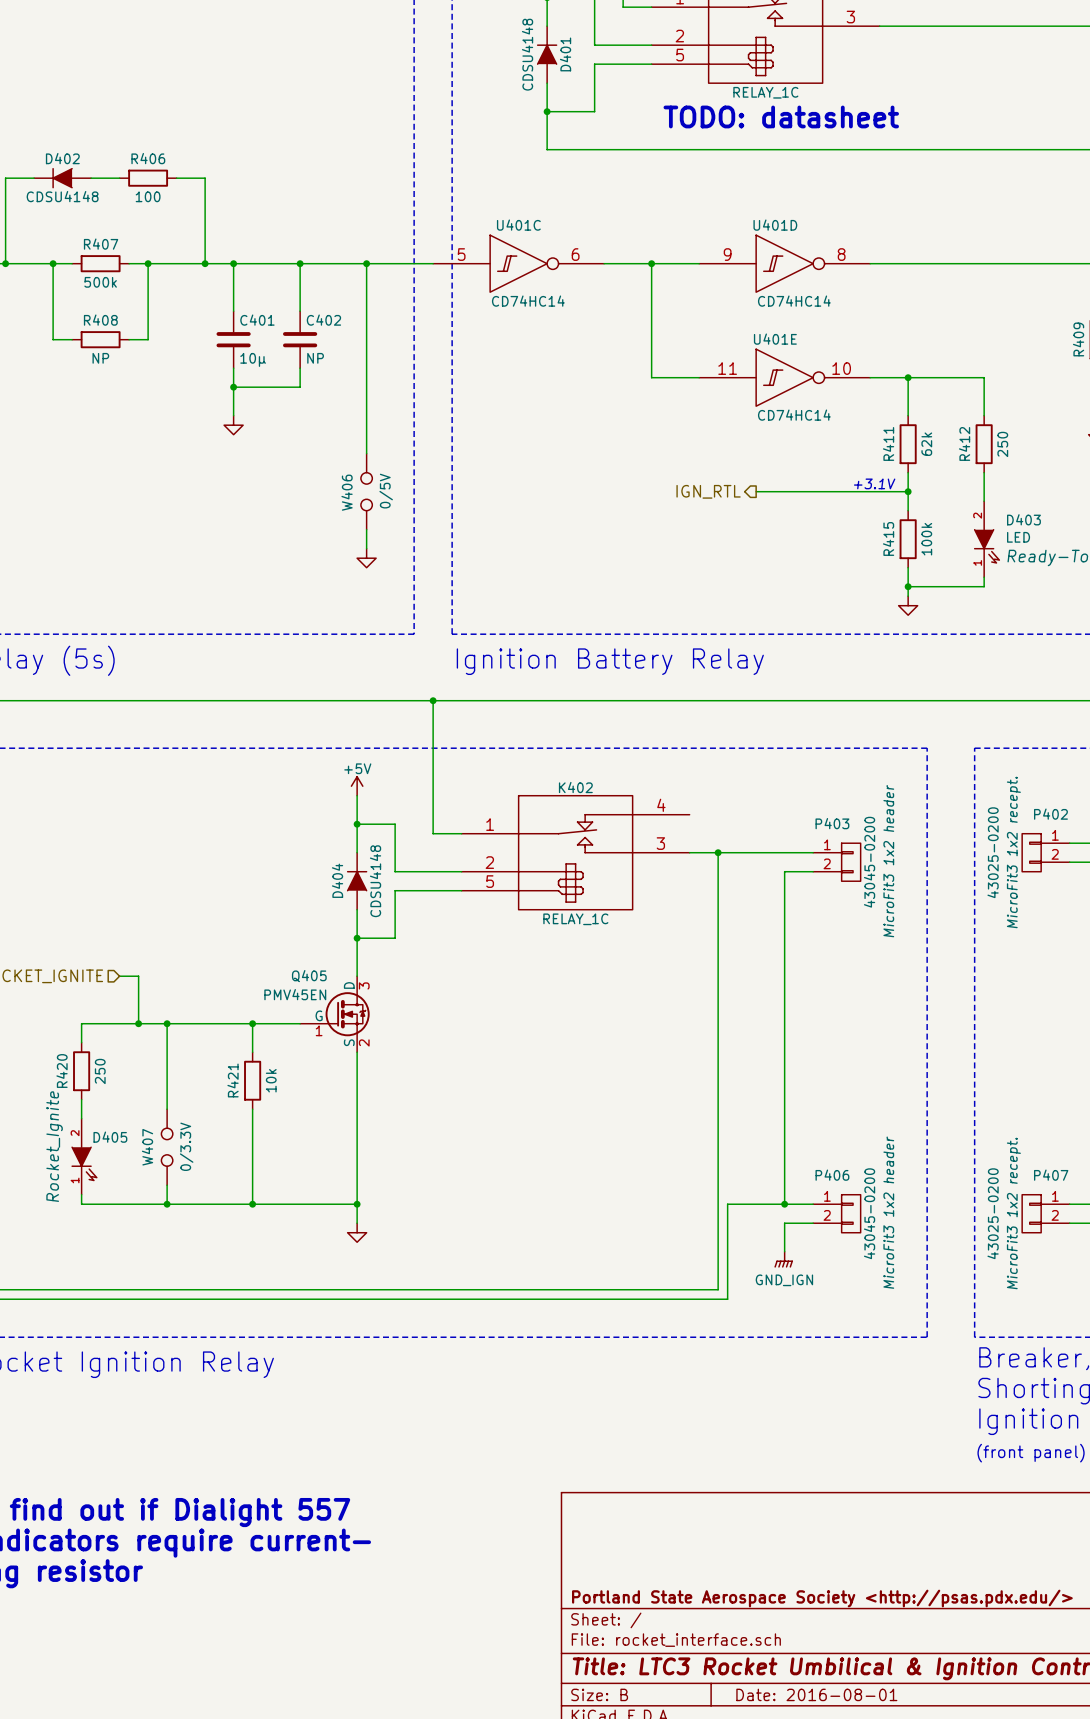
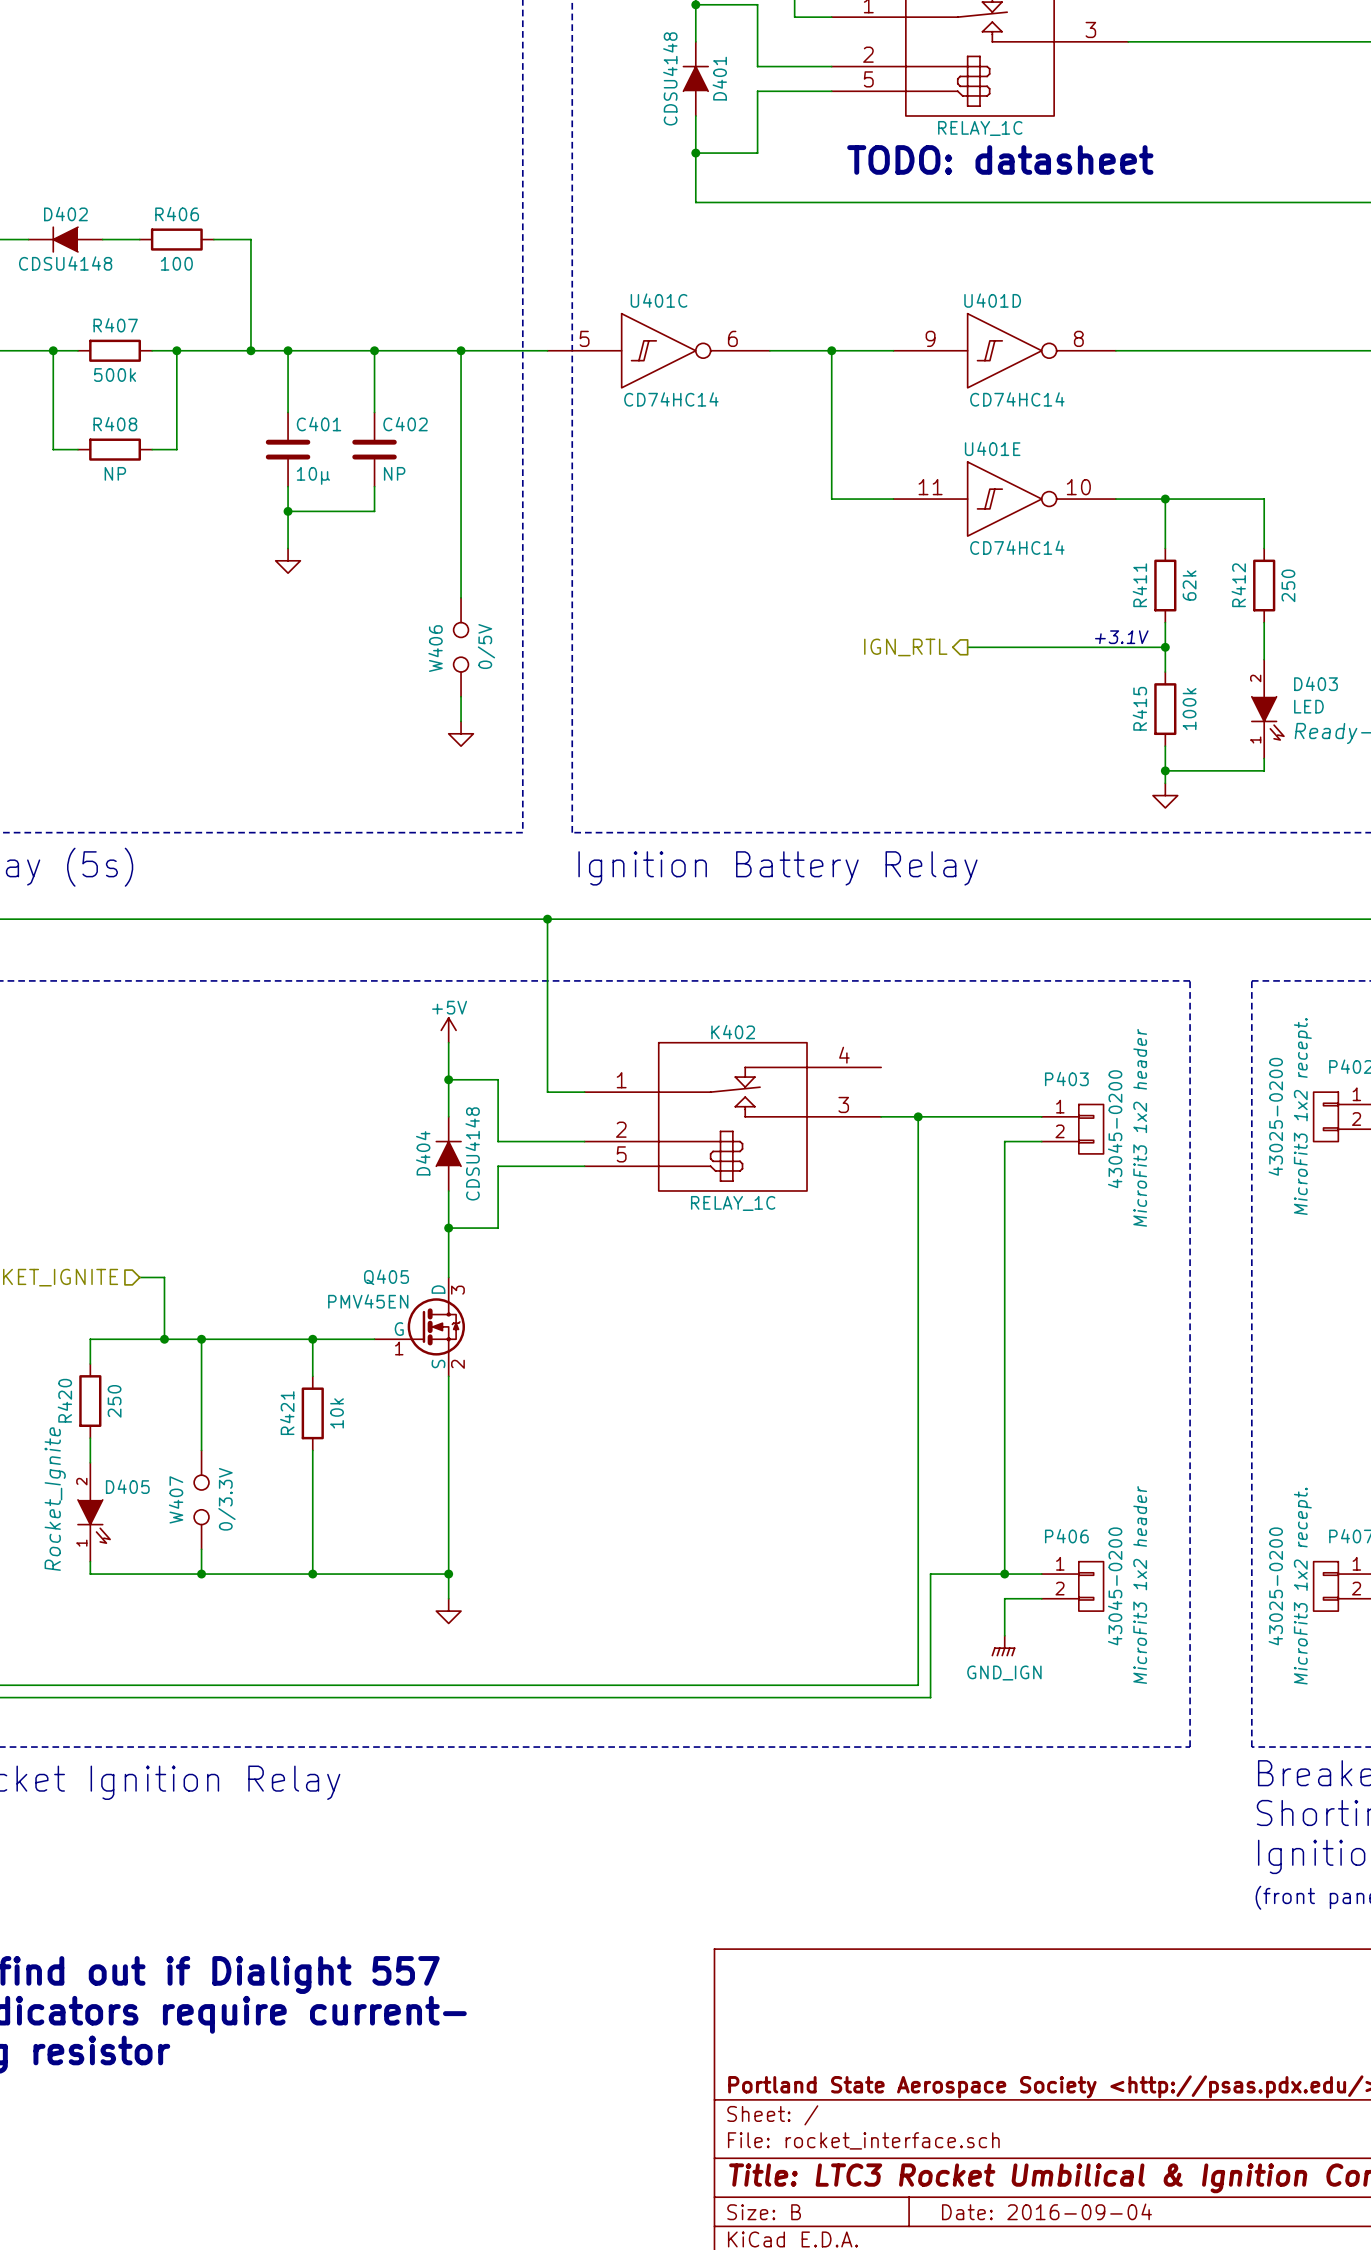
title block: Date: 2016-08-01 (816, 1694) -> Date: 2016-09-04 (1046, 2211)

